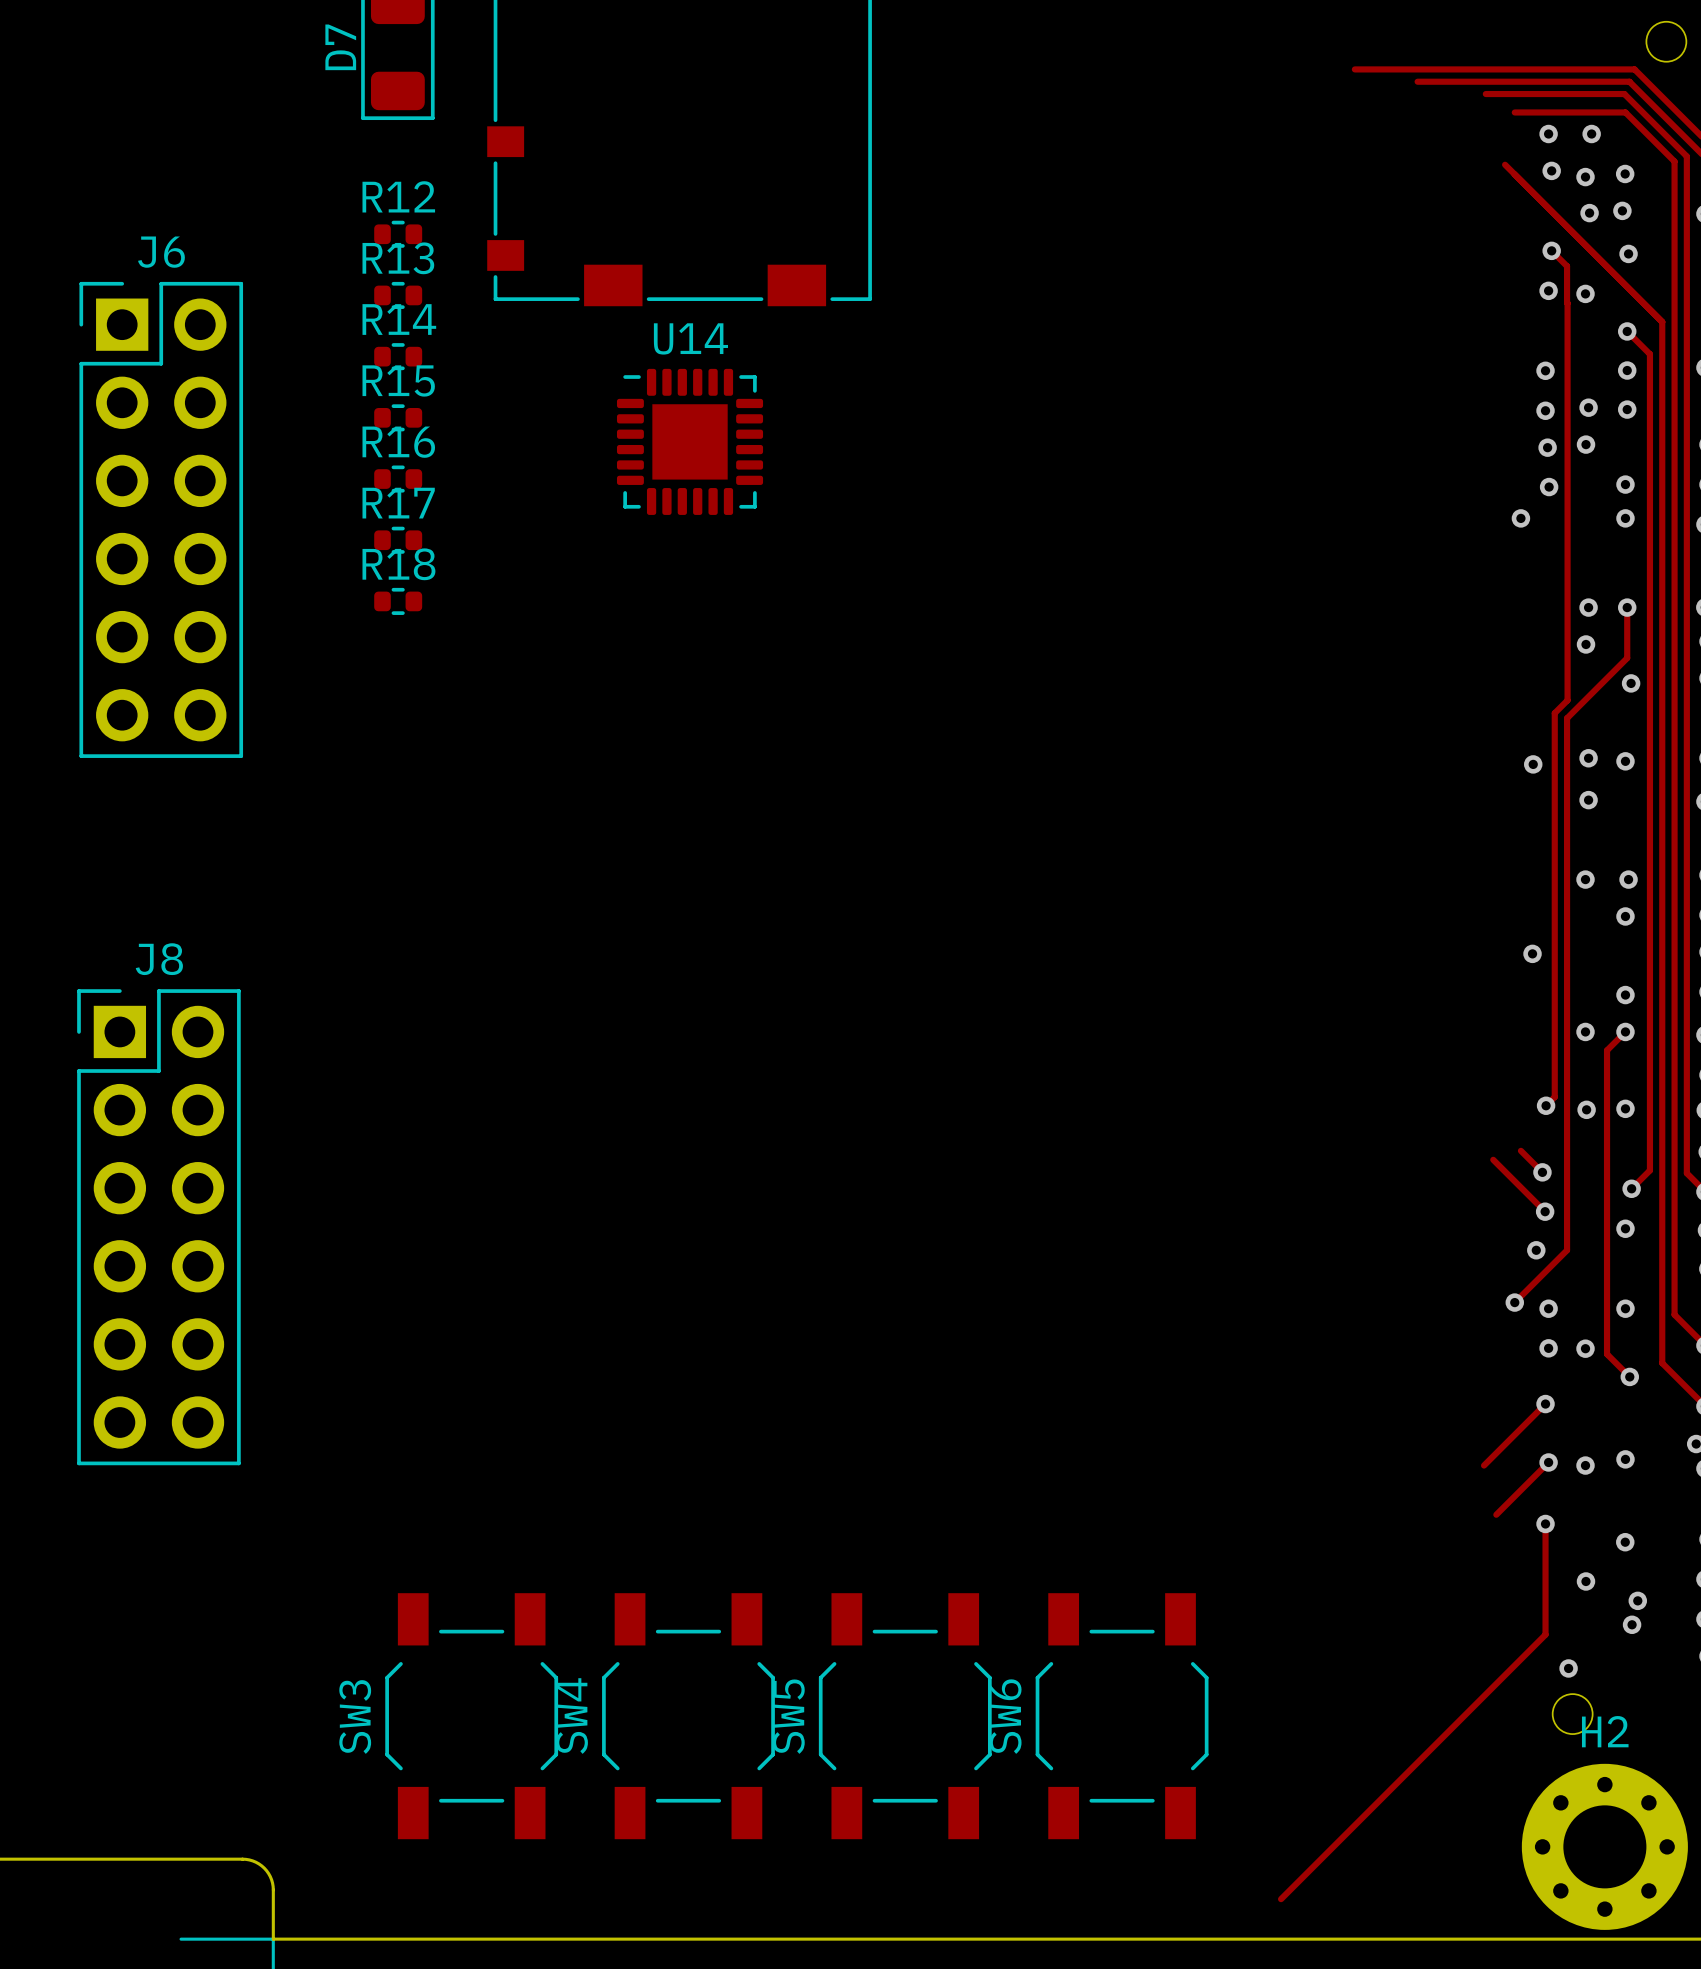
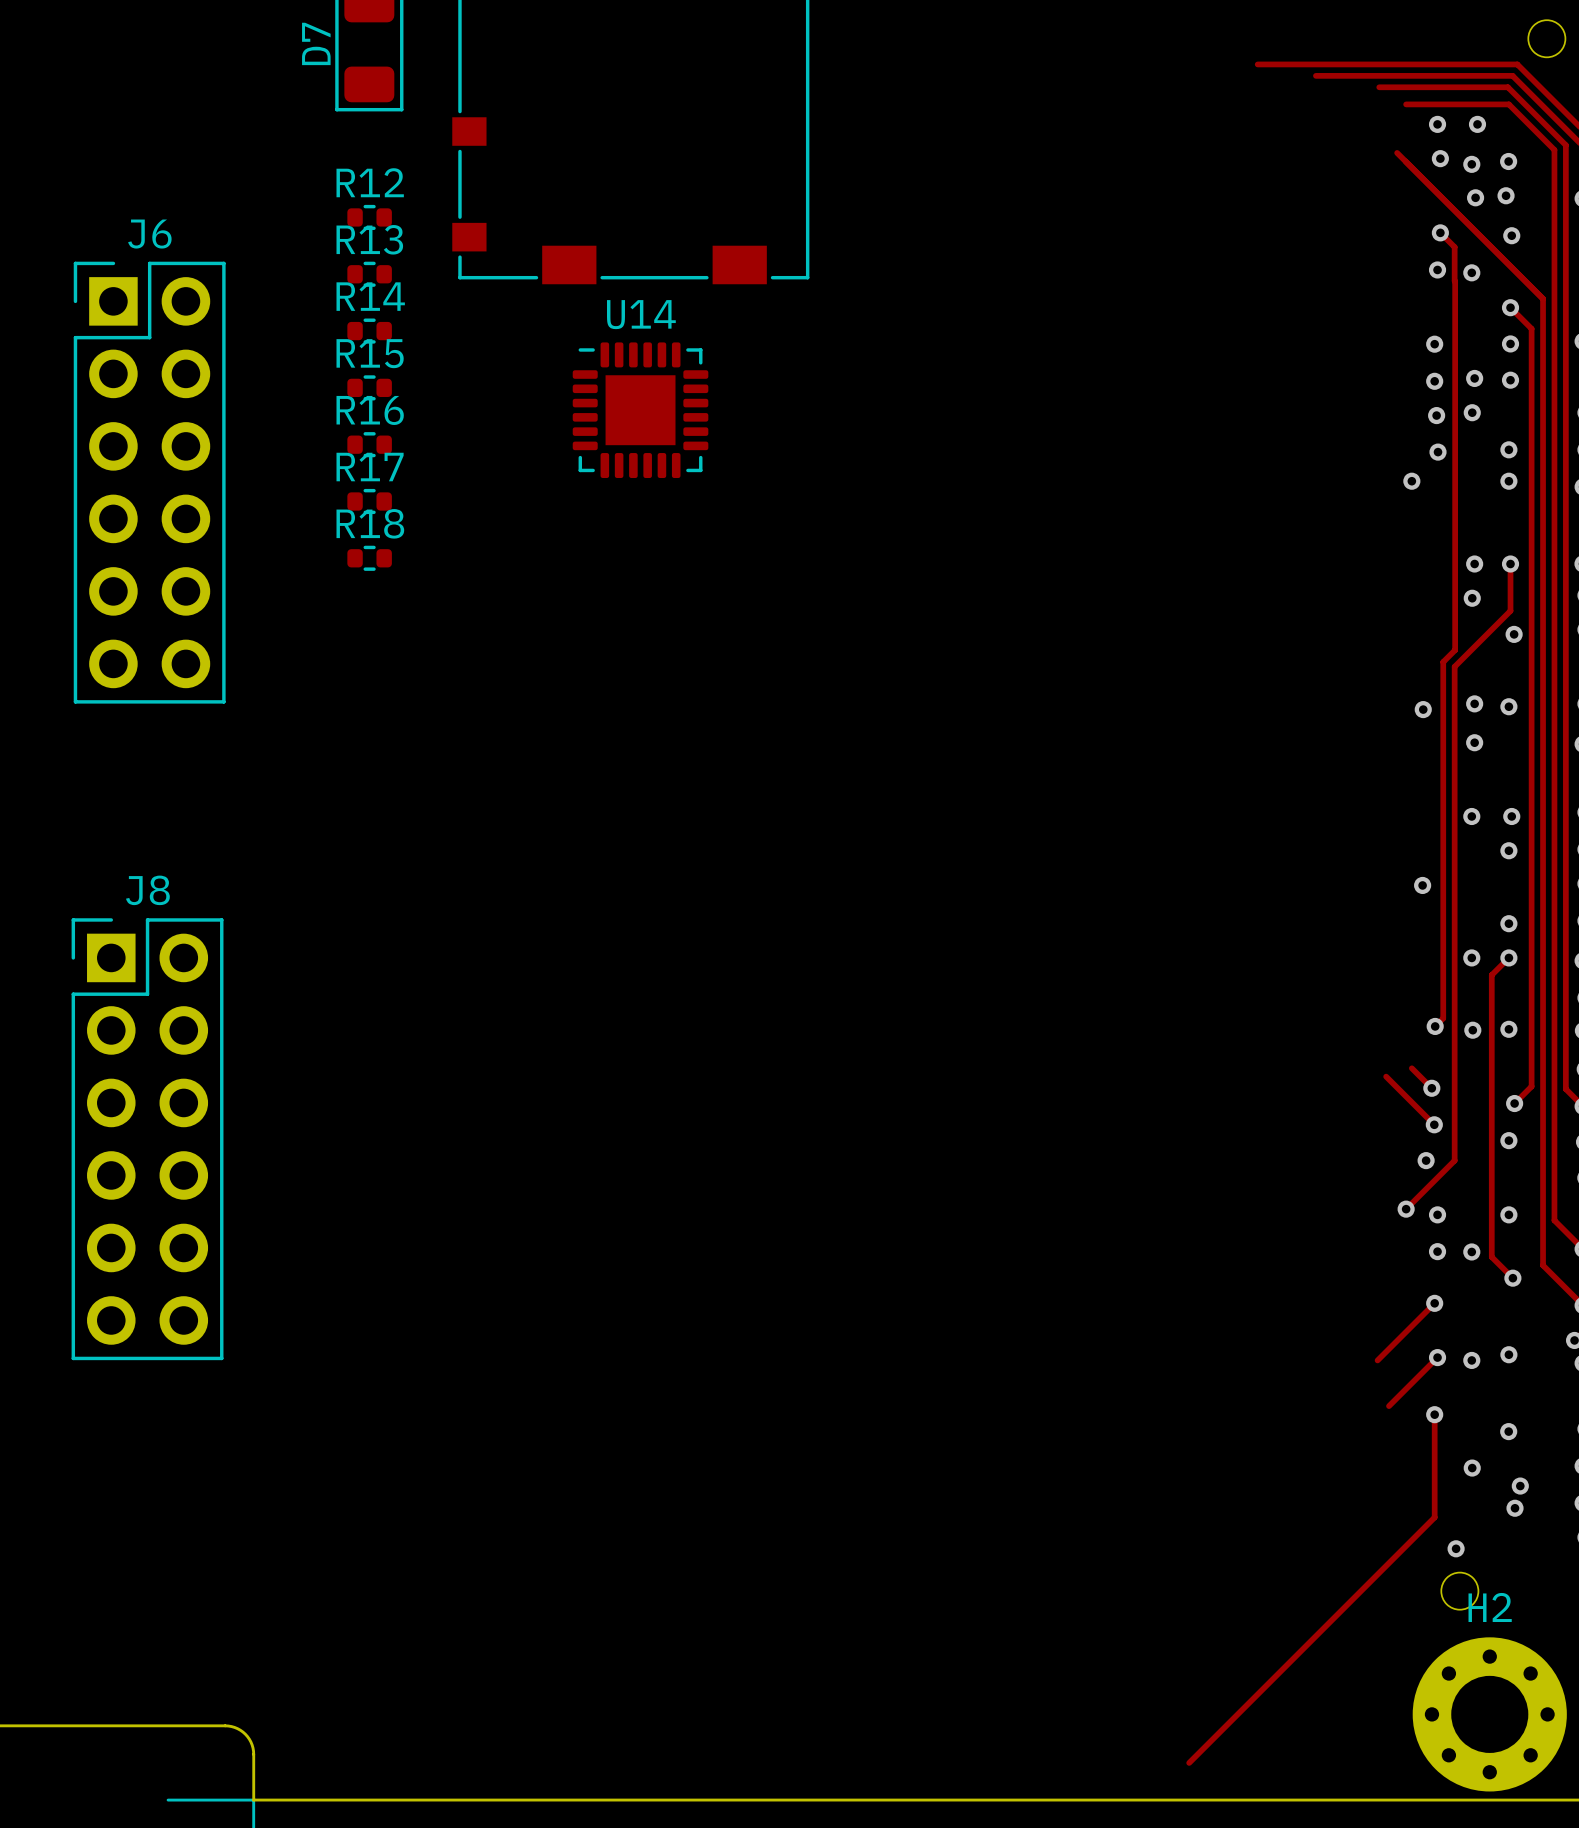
SW3: (471, 1716) -> none
SW4: (688, 1716) -> none
SW5: (905, 1716) -> none
SW6: (1122, 1716) -> none

